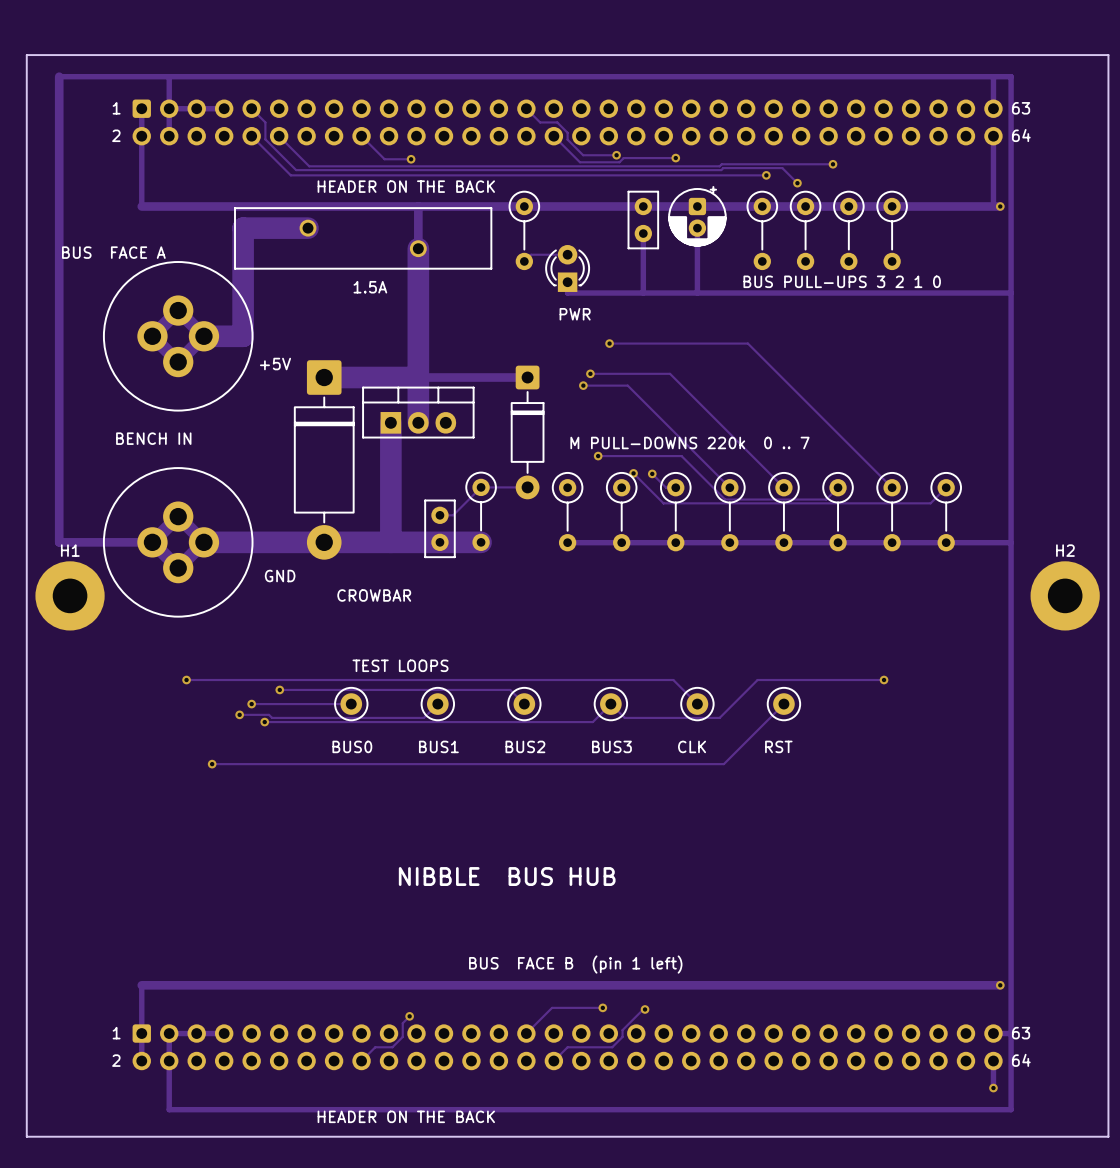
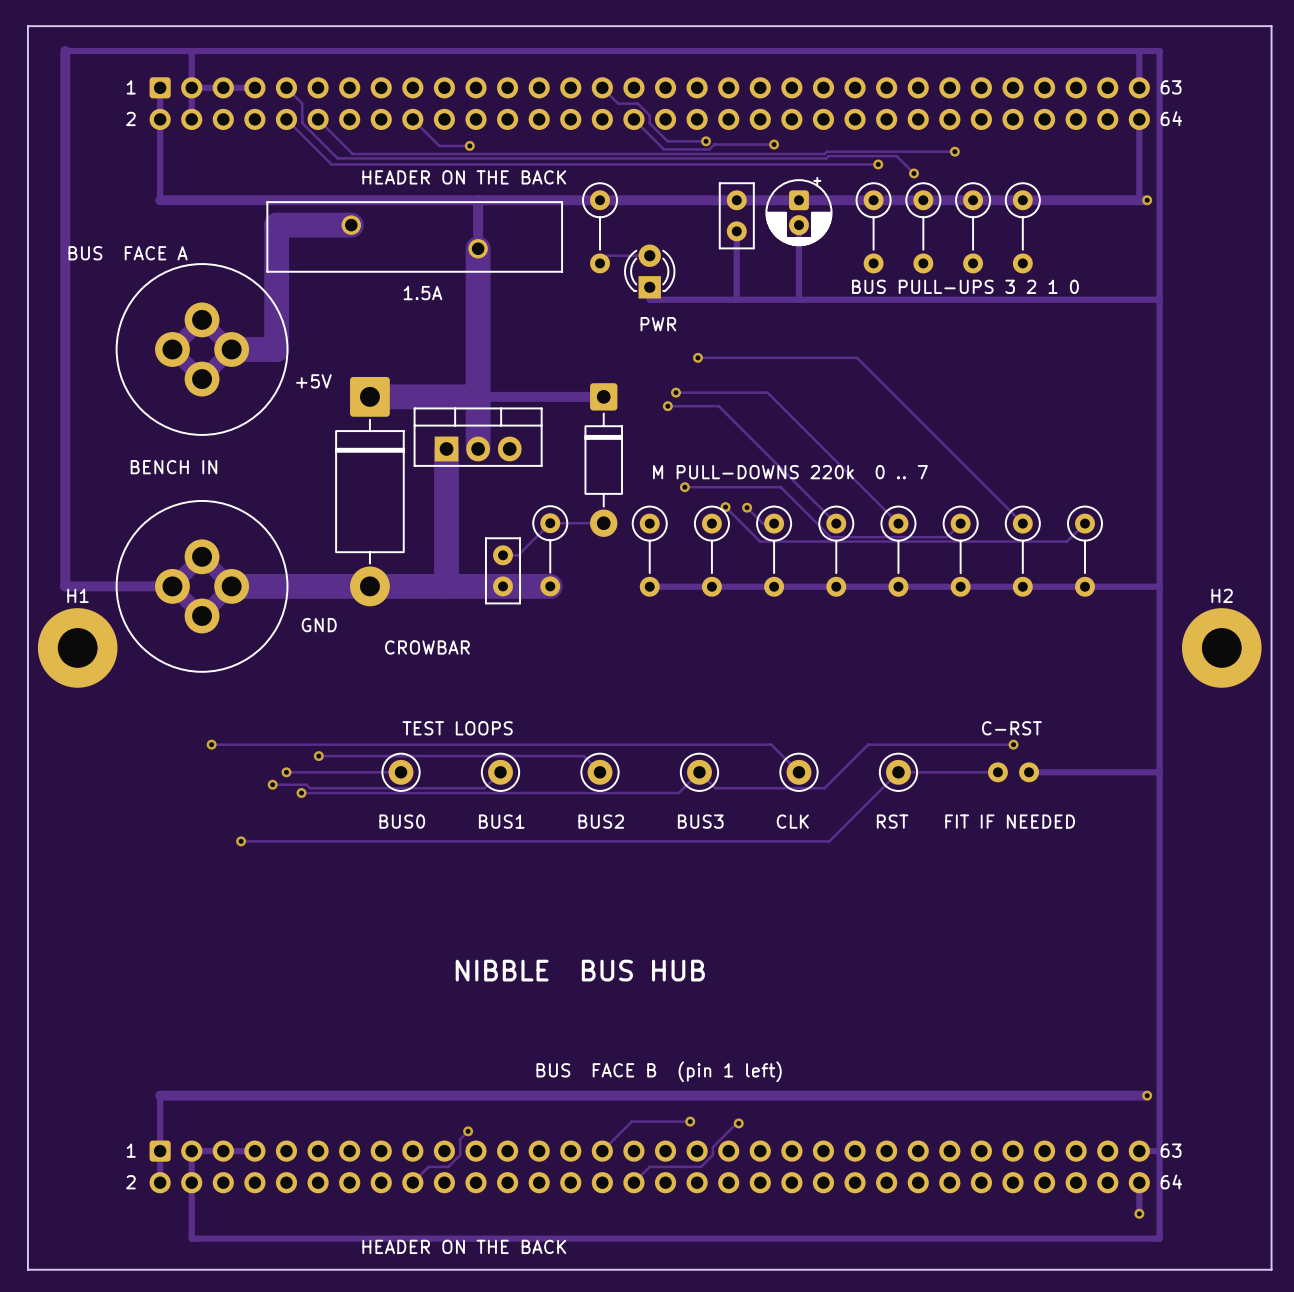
text: none -> C-RST (1011, 728)
track: none -> (898, 772) (997, 772)
part: none -> (1013, 772)
track: none -> (1029, 772) (1159, 772)
text: none -> FIT IF NEEDED (1010, 821)

